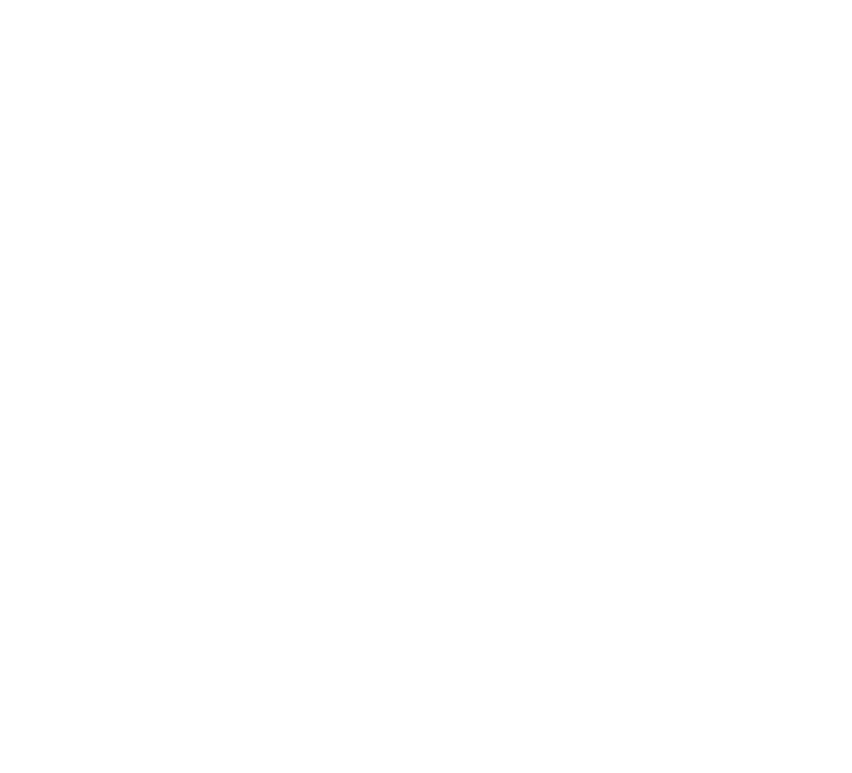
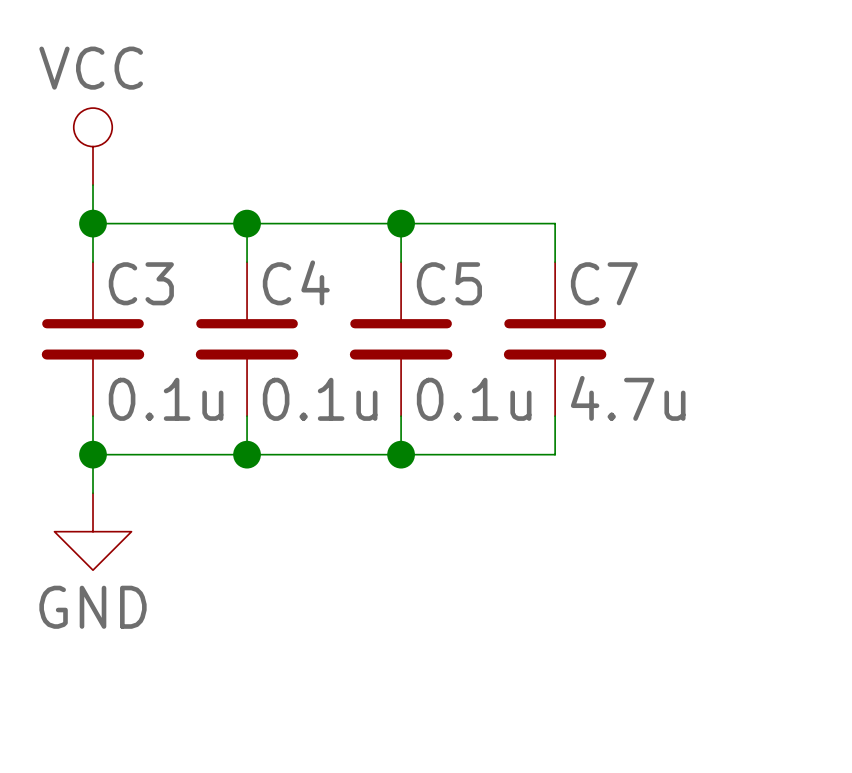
power symbol: none -> VCC (93, 146)
wire: none -> (93, 185) (93, 262)
wire: none -> (93, 223) (555, 223) (555, 262)
junction: none -> (93, 223)
wire: none -> (247, 223) (247, 262)
junction: none -> (247, 223)
wire: none -> (401, 223) (401, 262)
junction: none -> (401, 223)
C3: none -> 0.1u (93, 339)
C4: none -> 0.1u (247, 339)
C5: none -> 0.1u (401, 339)
C7: none -> 4.7u (555, 339)
wire: none -> (93, 416) (93, 493)
wire: none -> (247, 416) (247, 454)
wire: none -> (401, 416) (401, 454)
wire: none -> (555, 416) (555, 454) (93, 454)
junction: none -> (93, 454)
junction: none -> (247, 454)
junction: none -> (401, 454)
power symbol: none -> GND (93, 531)

